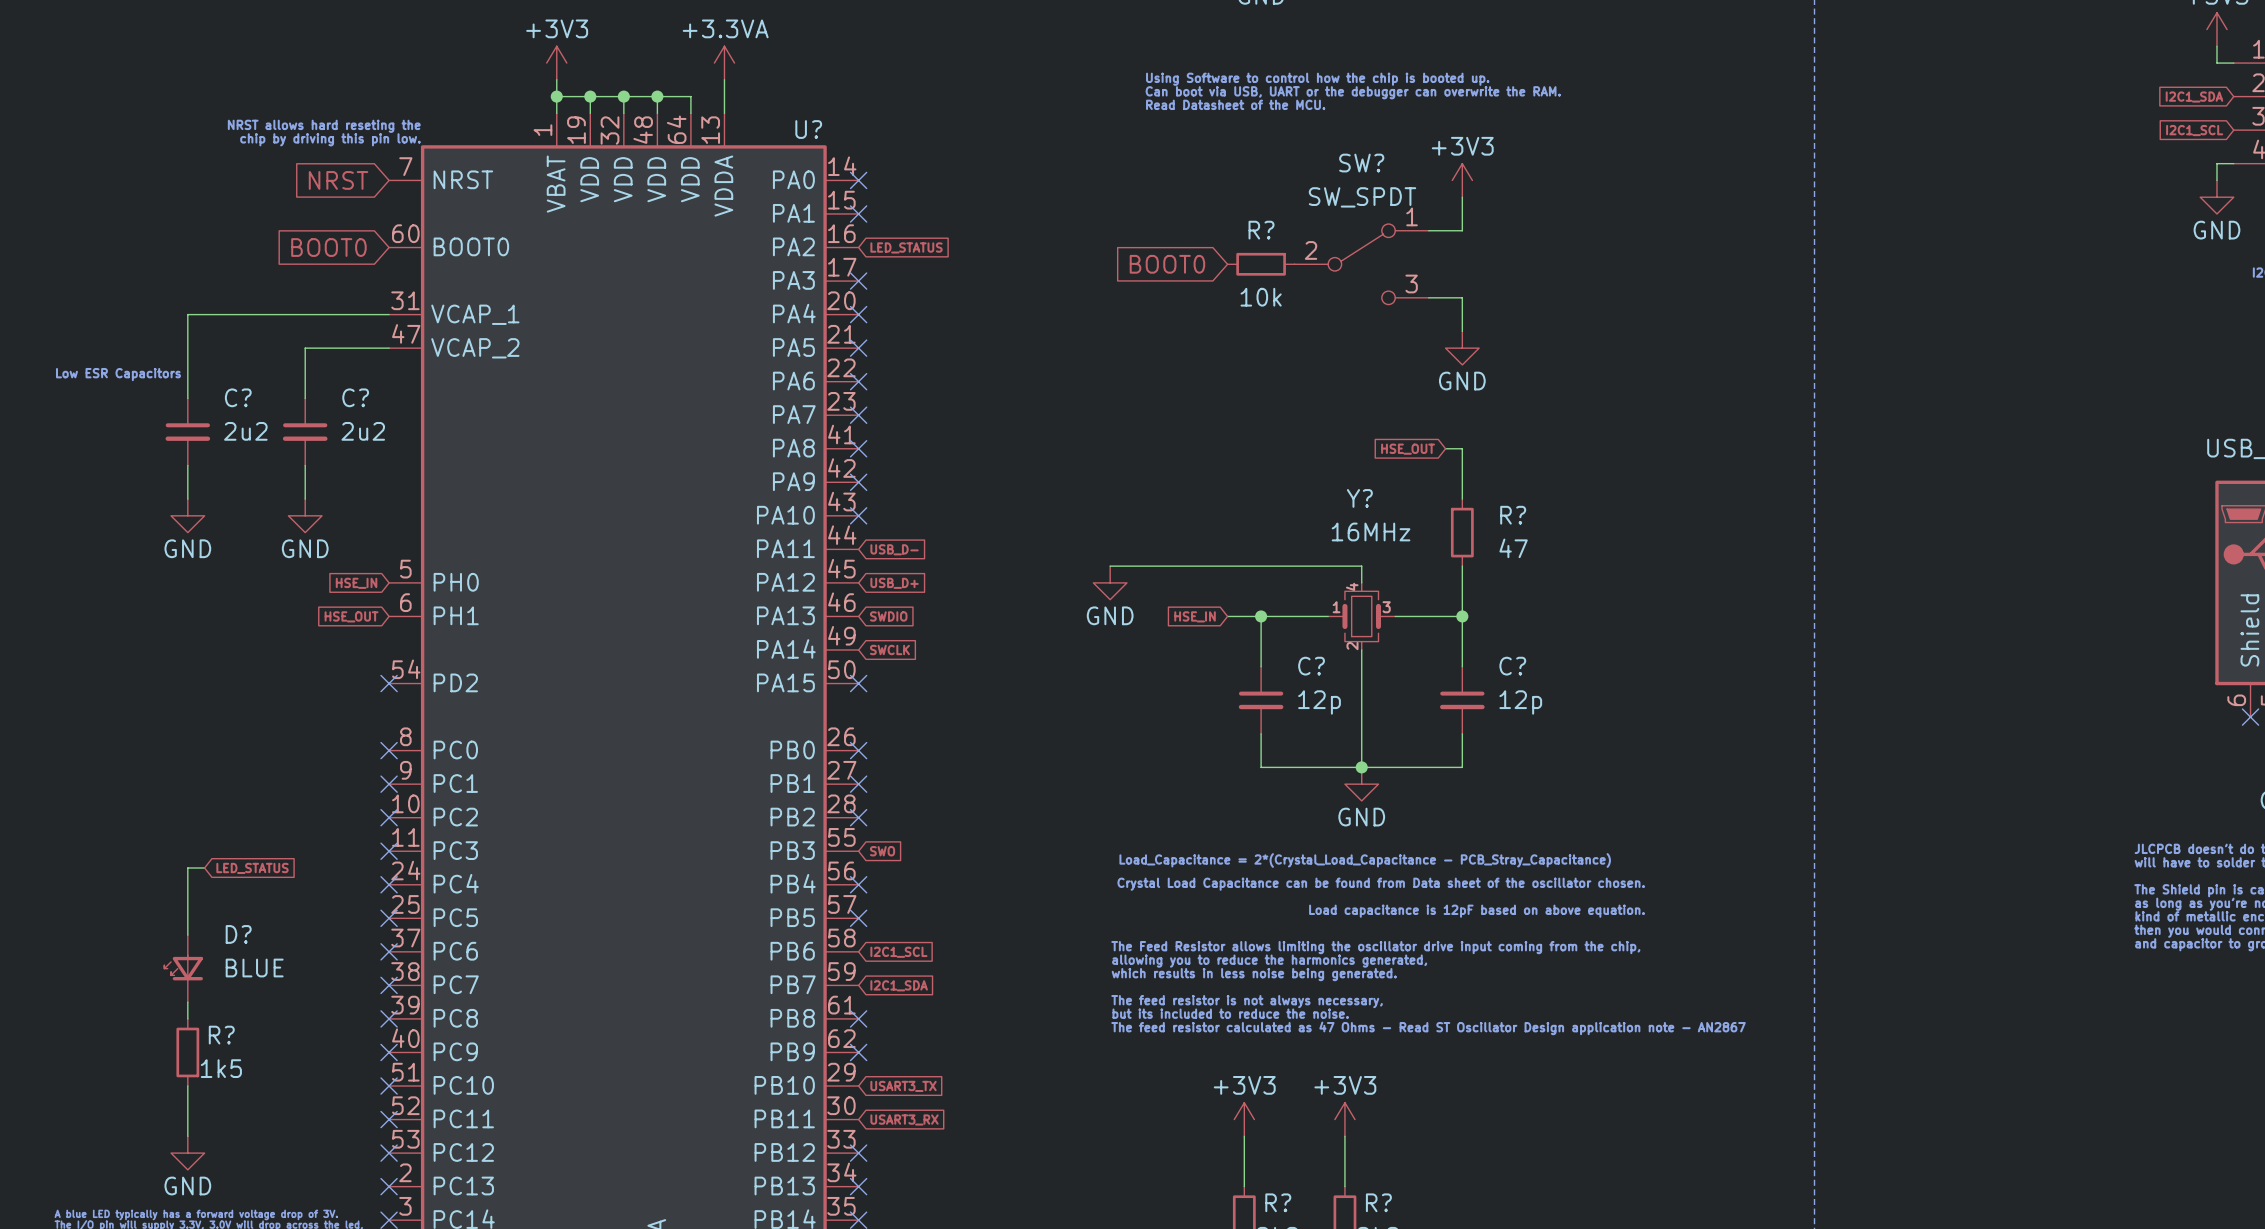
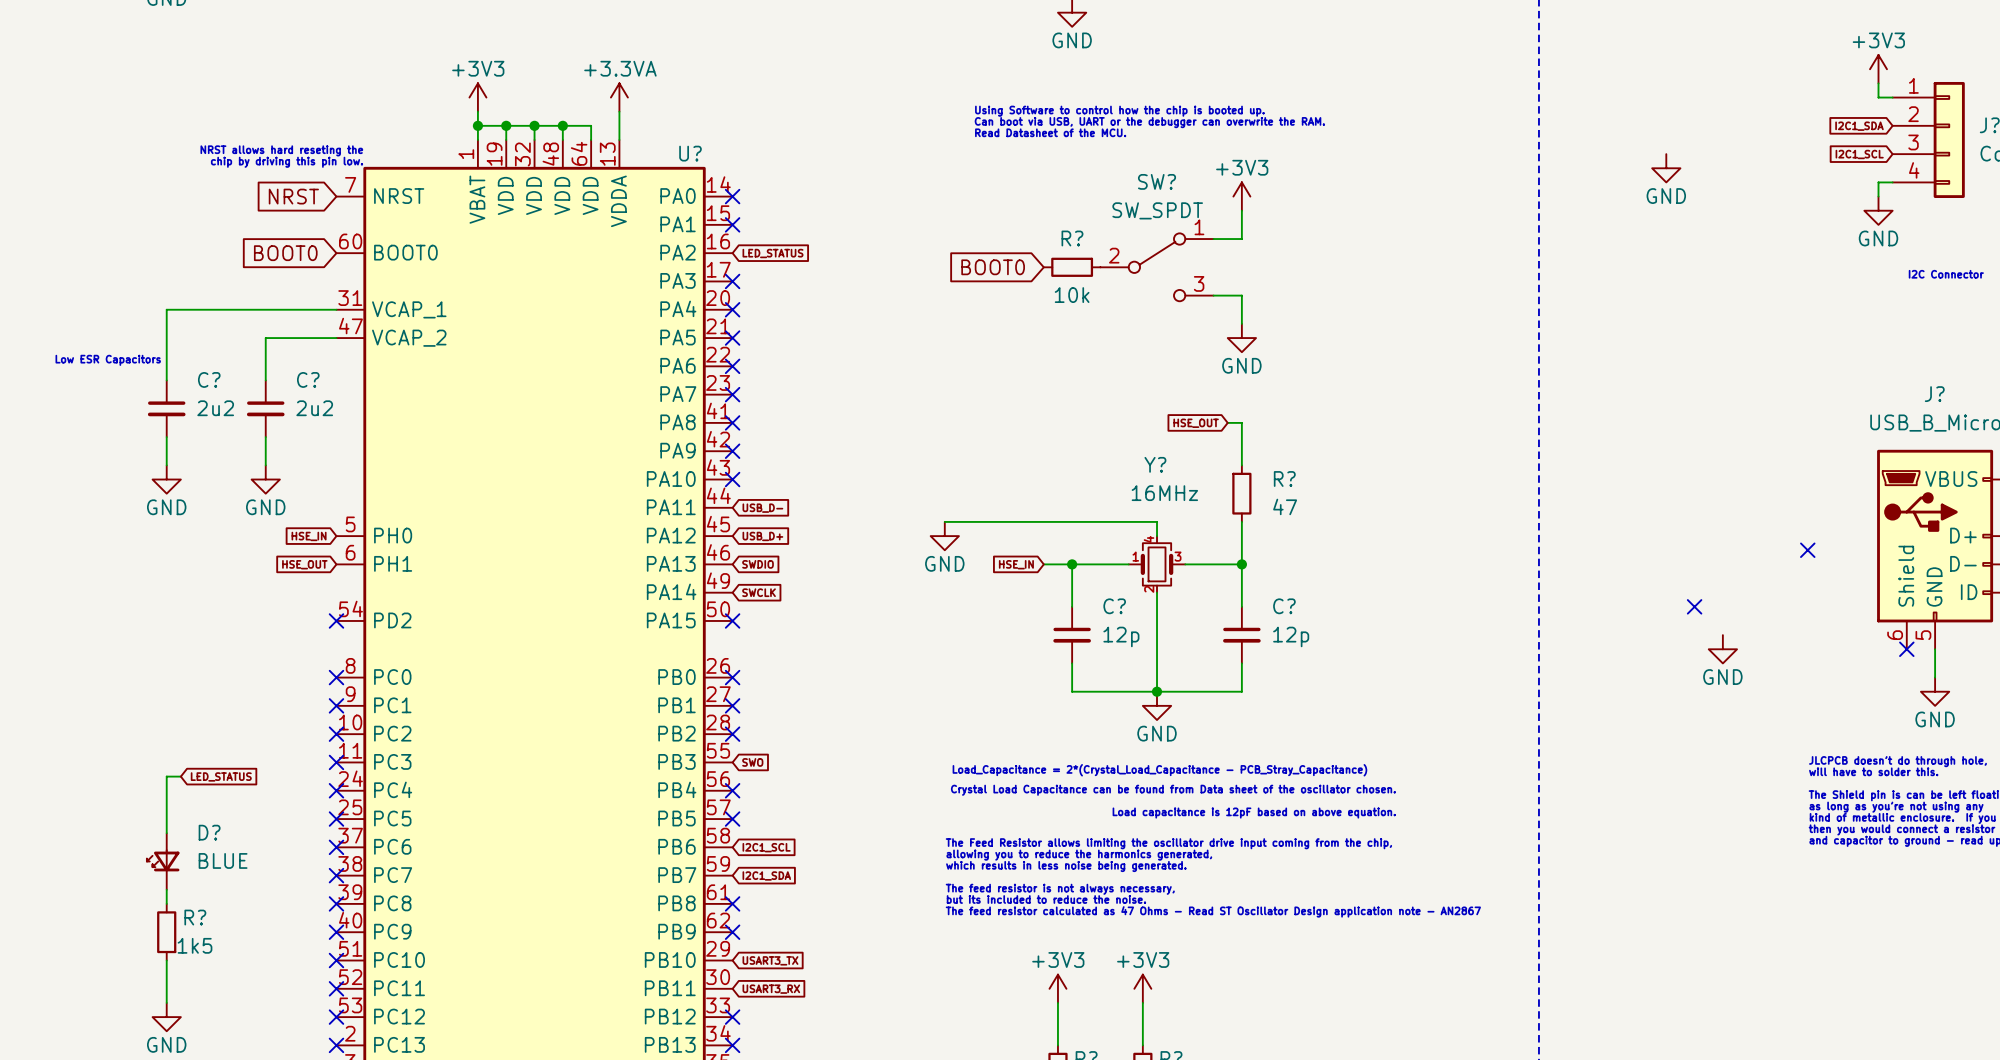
power symbol: none -> GND (1666, 168)
no-connect mark: none -> (1807, 550)
no-connect mark: none -> (1694, 606)
power symbol: none -> GND (1722, 649)

